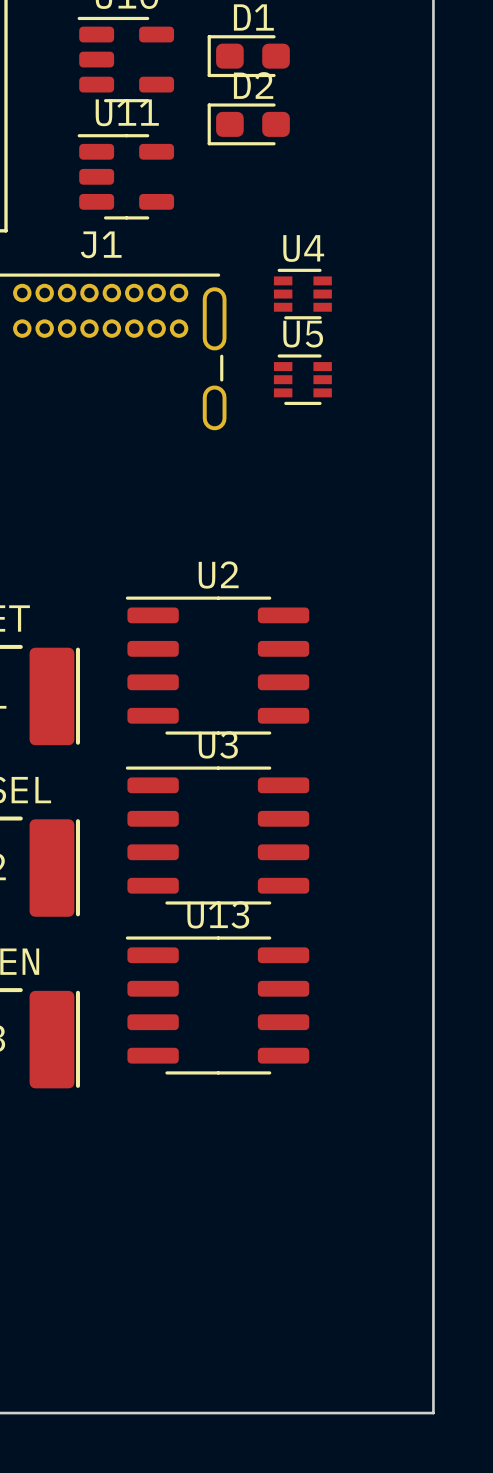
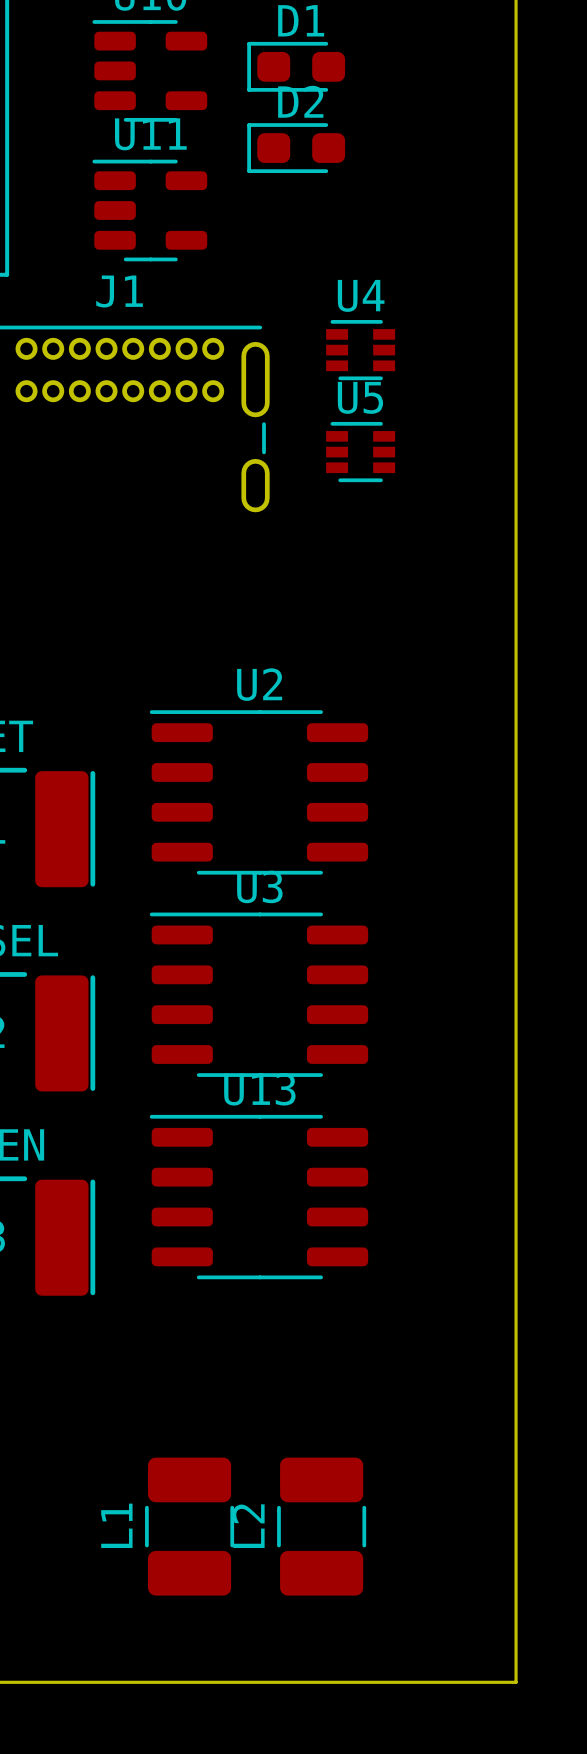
L1: none -> (189, 1526)
L2: none -> (321, 1526)

